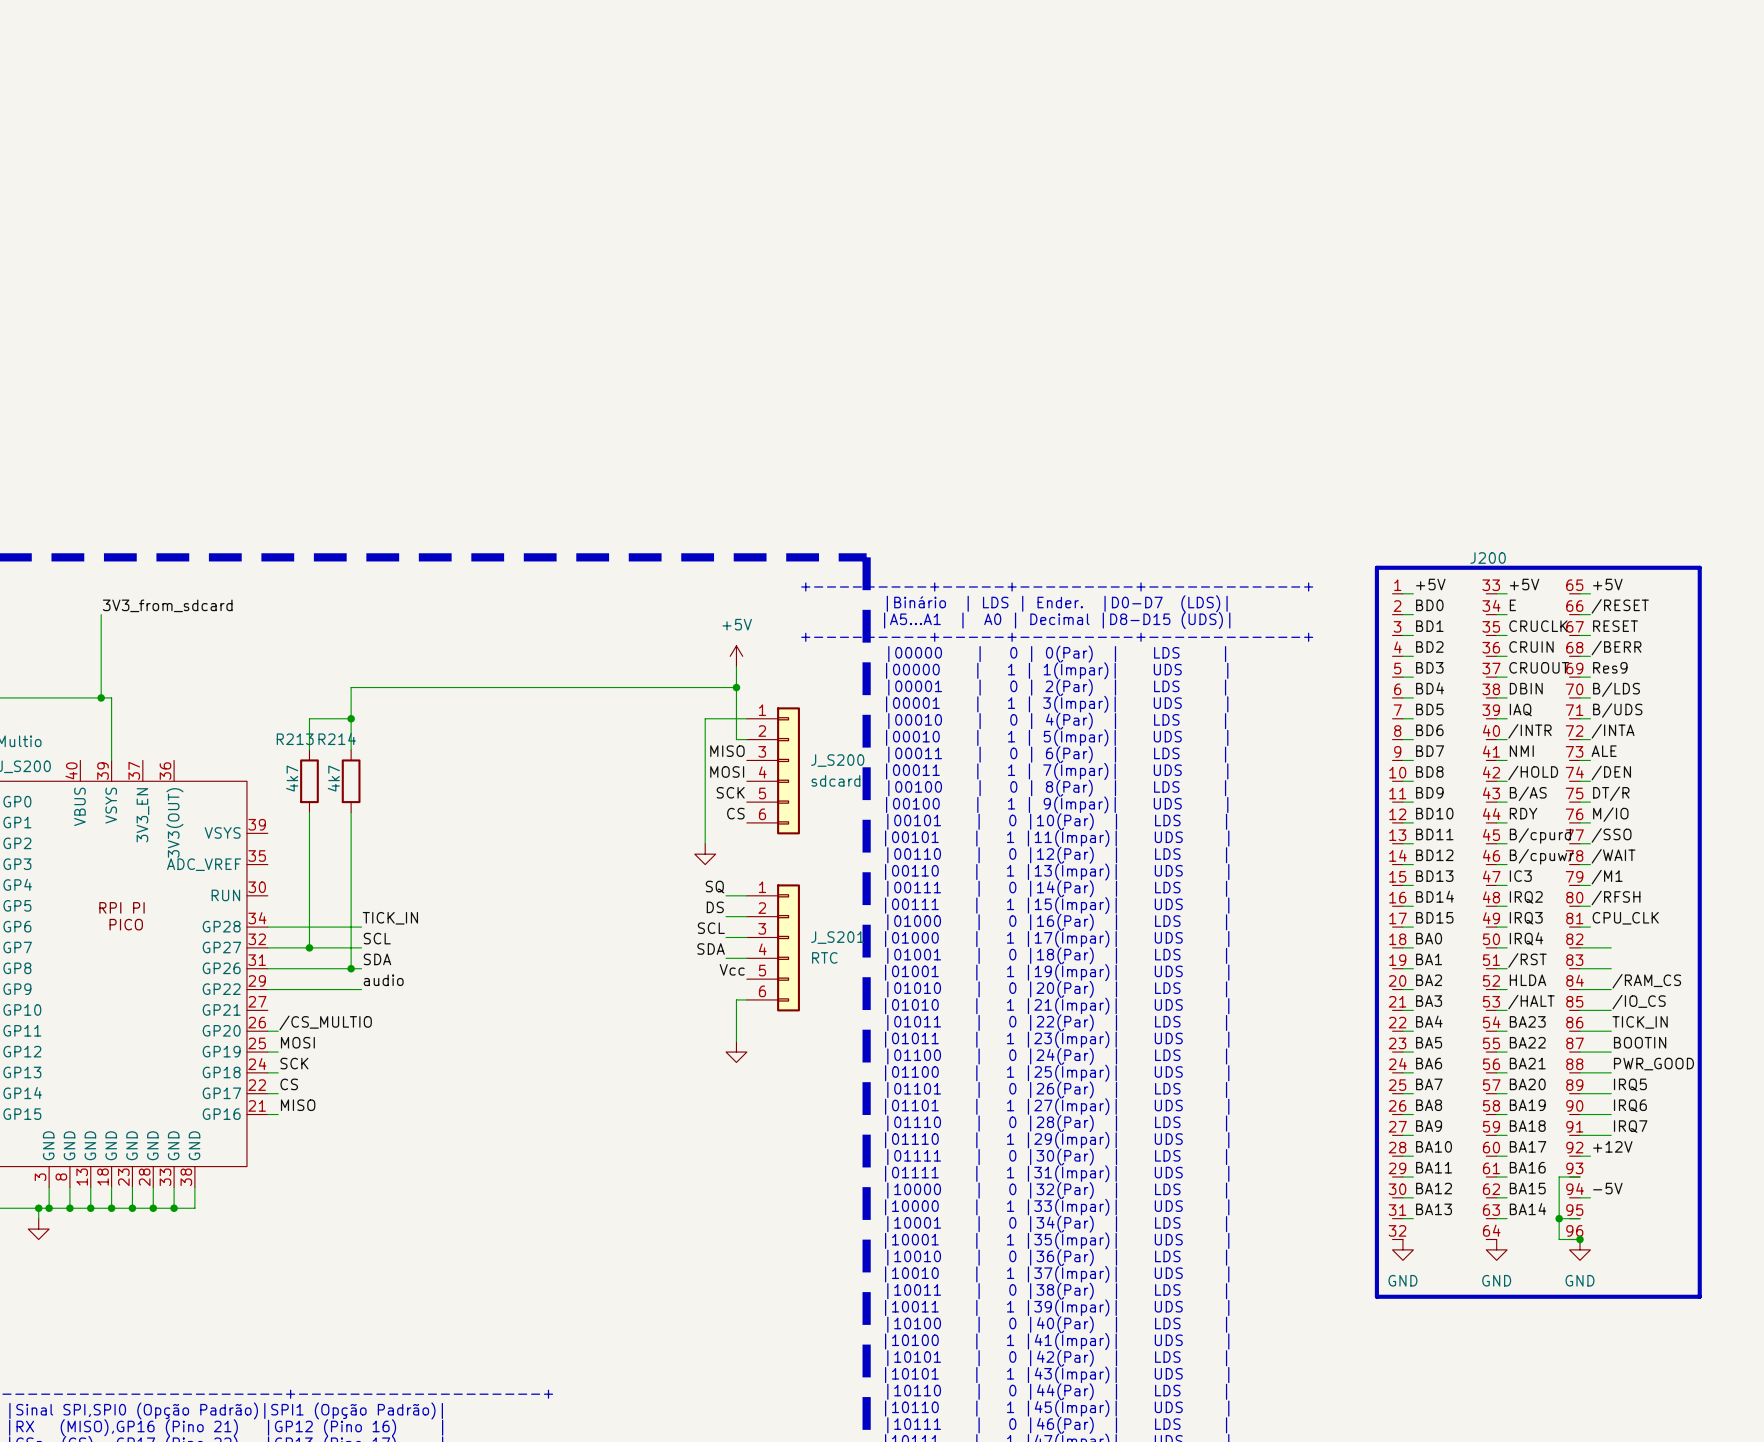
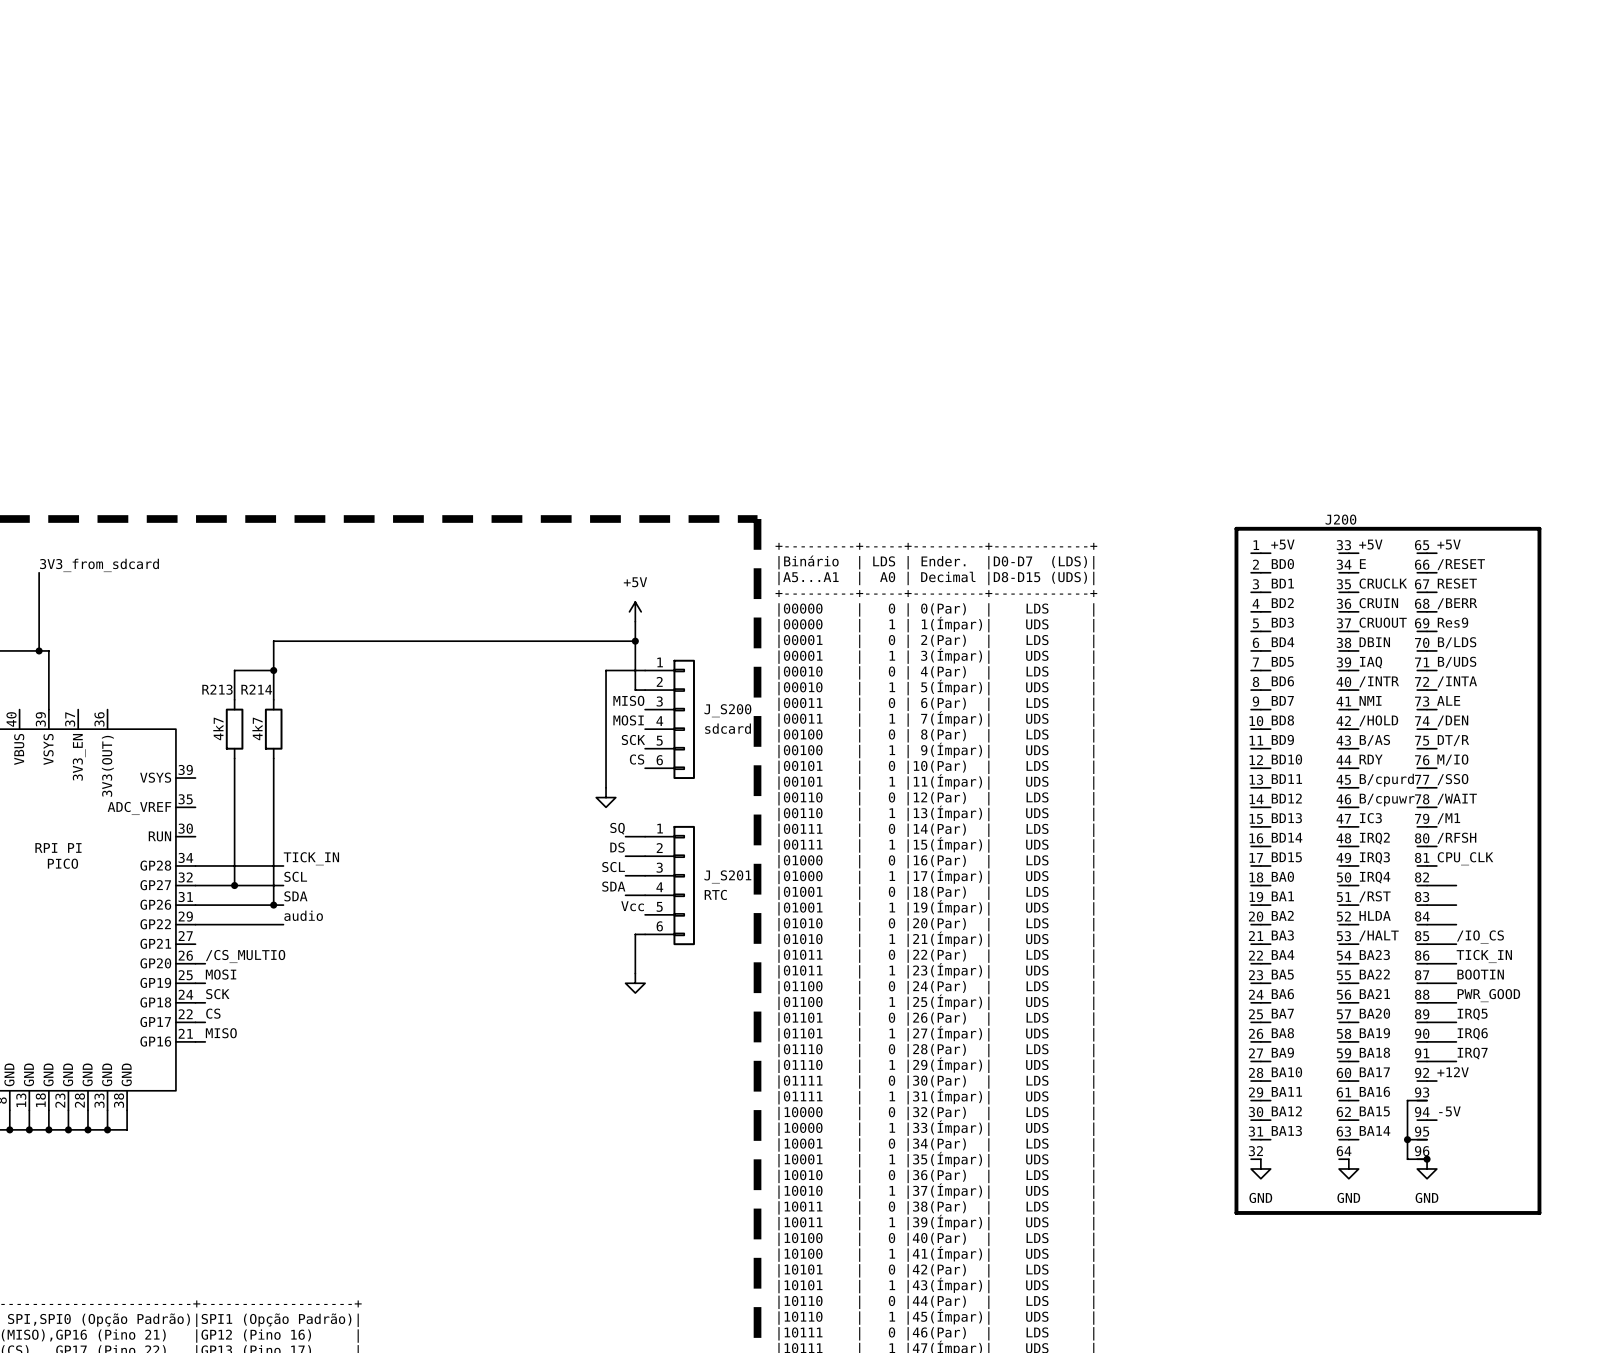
label: /RAM_CS (1646, 981) -> none

